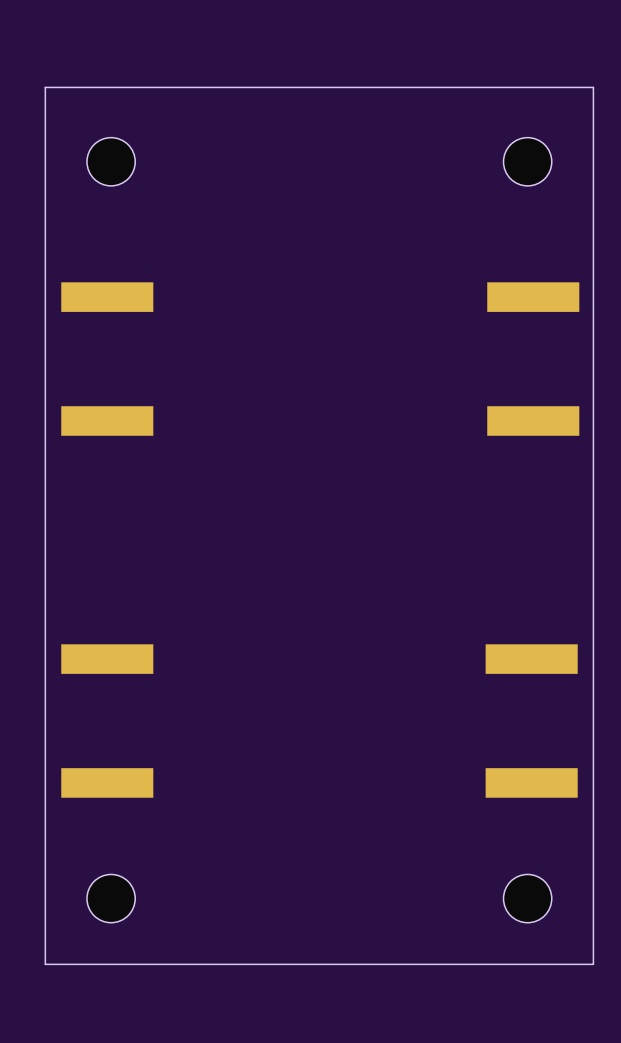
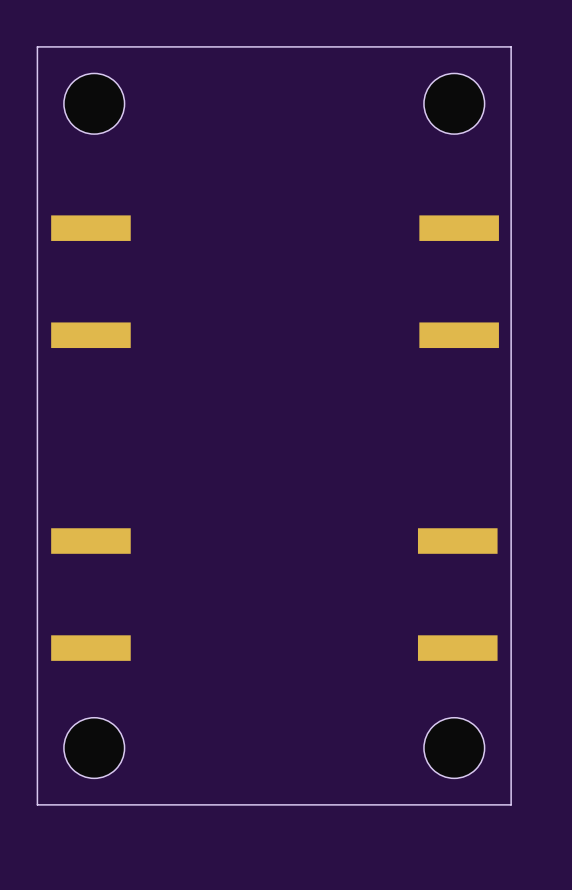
part footprint: [86, 137, 136, 186] -> [63, 73, 125, 135]
part footprint: [503, 137, 552, 186] -> [423, 73, 485, 135]
part footprint: [86, 874, 136, 923] -> [63, 717, 125, 779]
part footprint: [503, 874, 552, 923] -> [423, 717, 485, 779]

